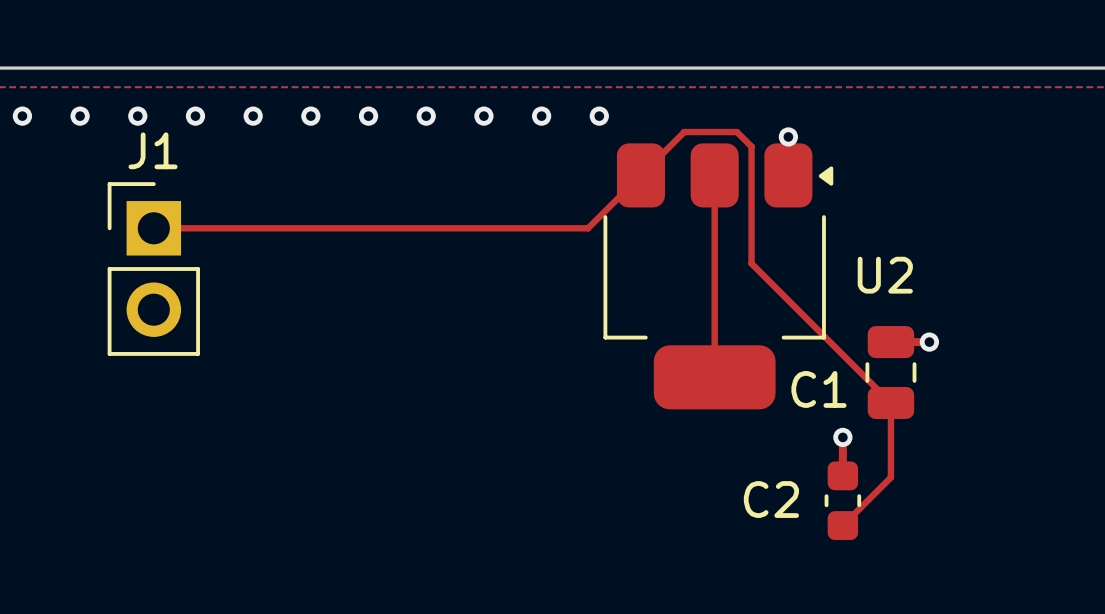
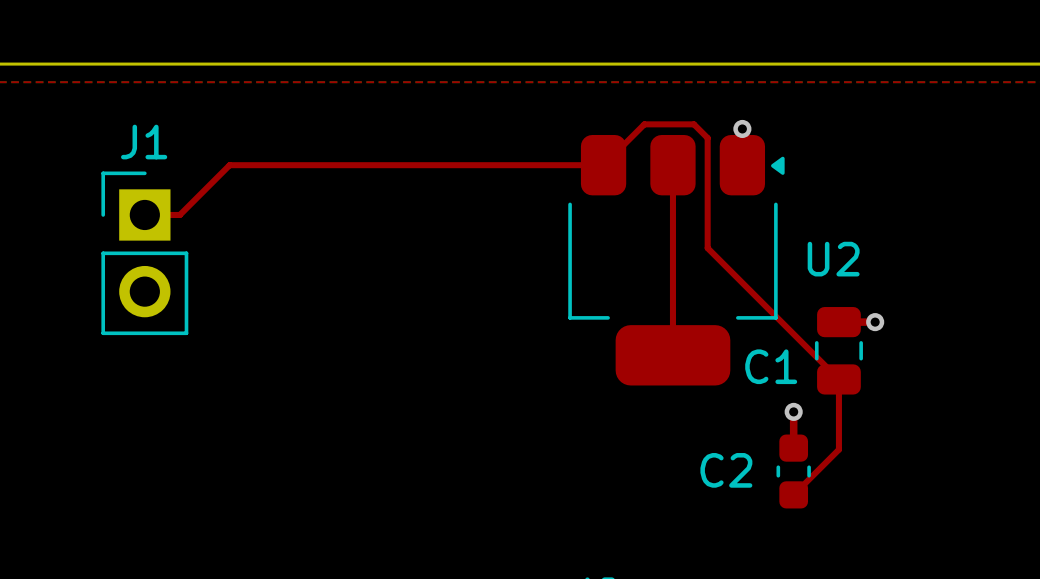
via: (22, 116) -> none
via: (80, 116) -> none
via: (137, 116) -> none
via: (195, 116) -> none
via: (253, 116) -> none
via: (310, 116) -> none
via: (368, 116) -> none
via: (426, 116) -> none
via: (483, 116) -> none
via: (541, 116) -> none
via: (599, 116) -> none
top track: (640, 175) (588, 228) (191, 228) -> (603, 165) (229, 165) (179, 214)

